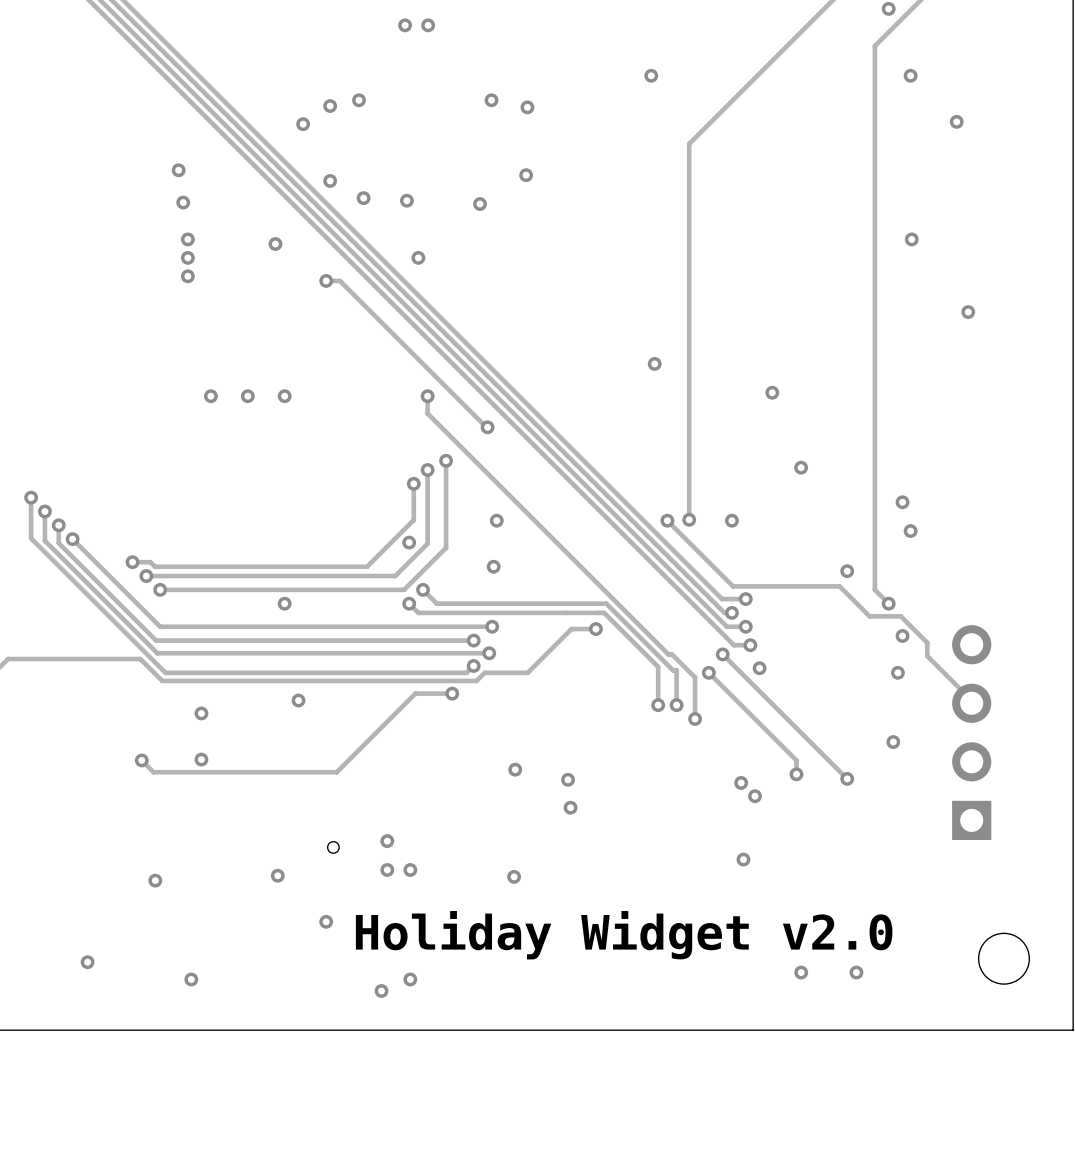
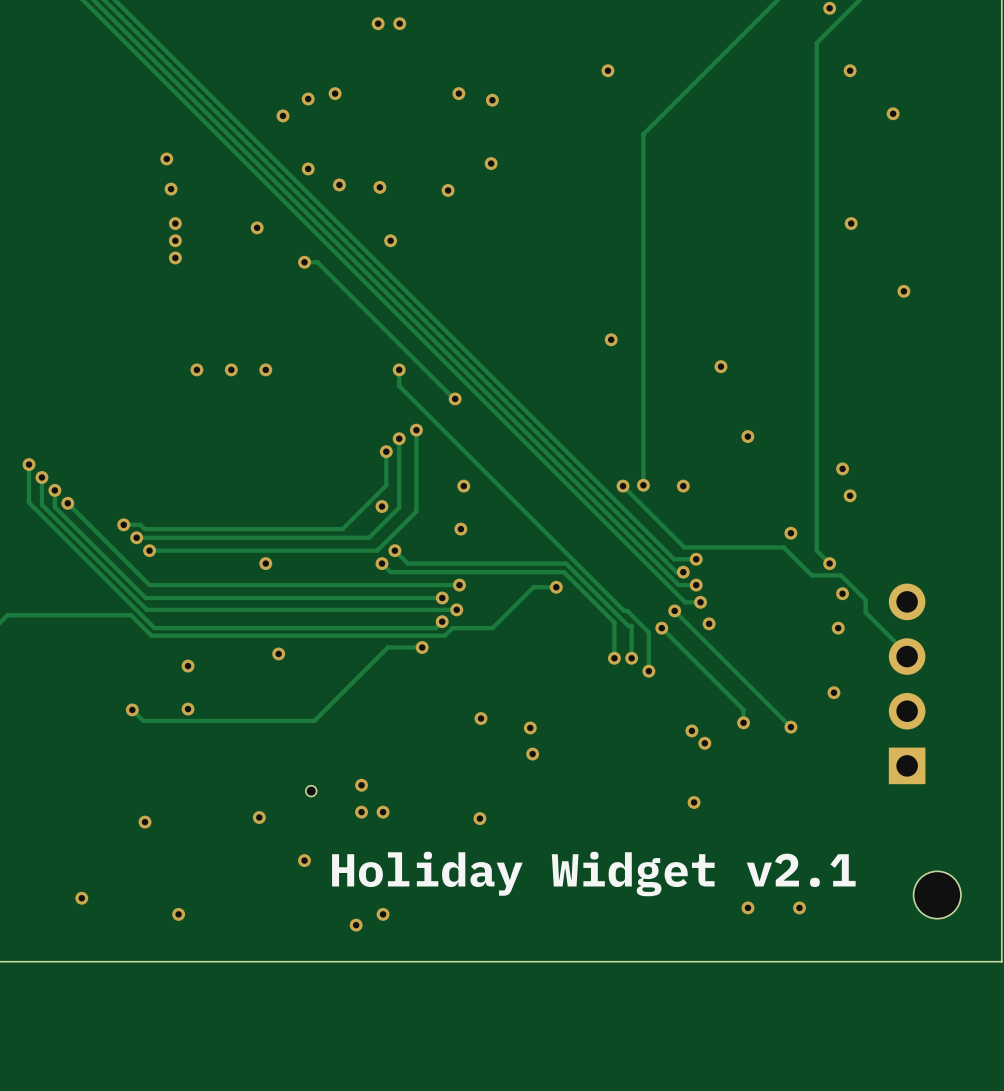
text: Holiday Widget v2.0 (624, 935) -> Holiday Widget v2.1 (593, 874)

